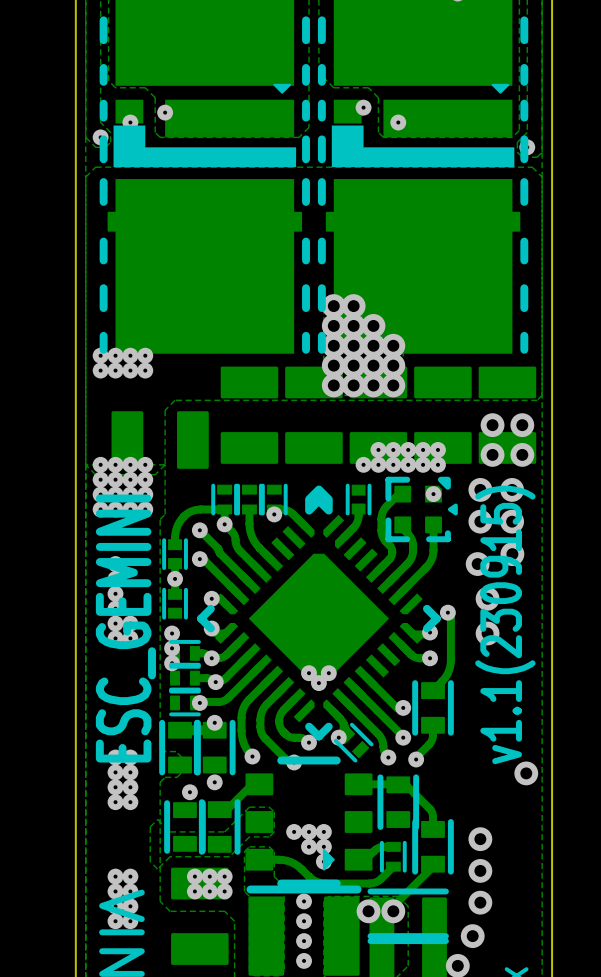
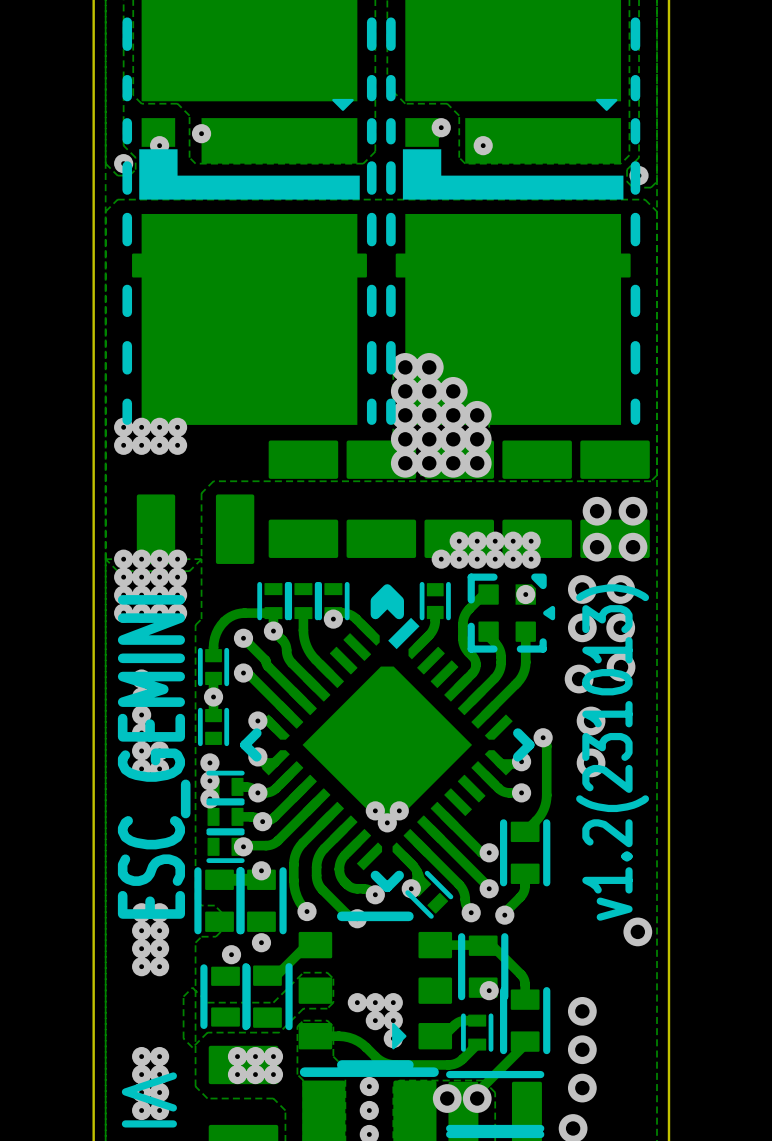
part footprint: [197, 485, 441, 741] -> [240, 584, 535, 893]
text: v1.1(230915) (505, 624) -> v1.2(231013) (612, 752)
via: none -> (489, 990)

